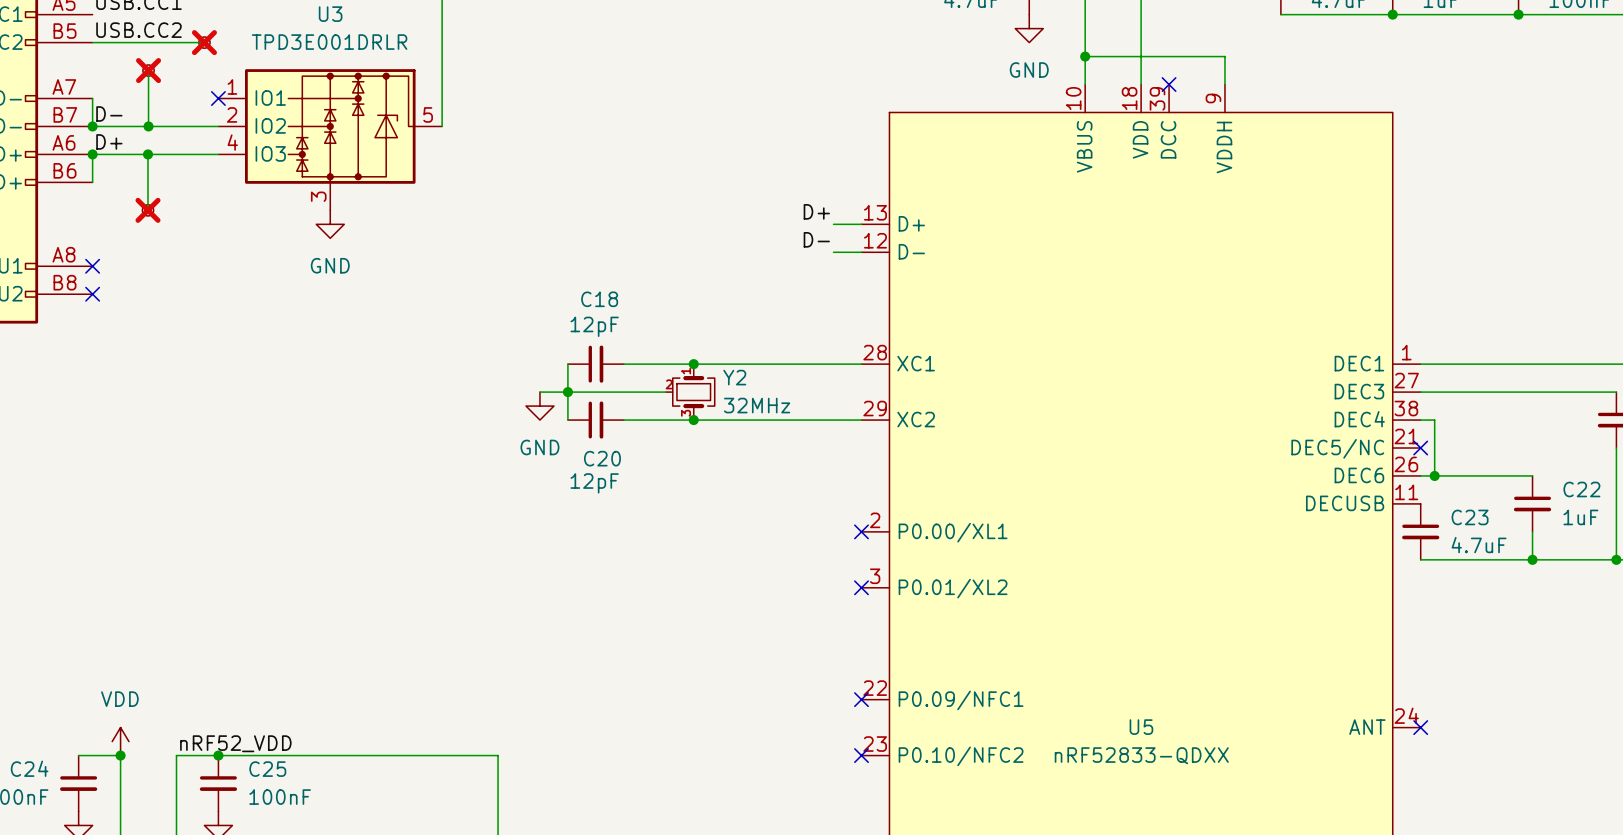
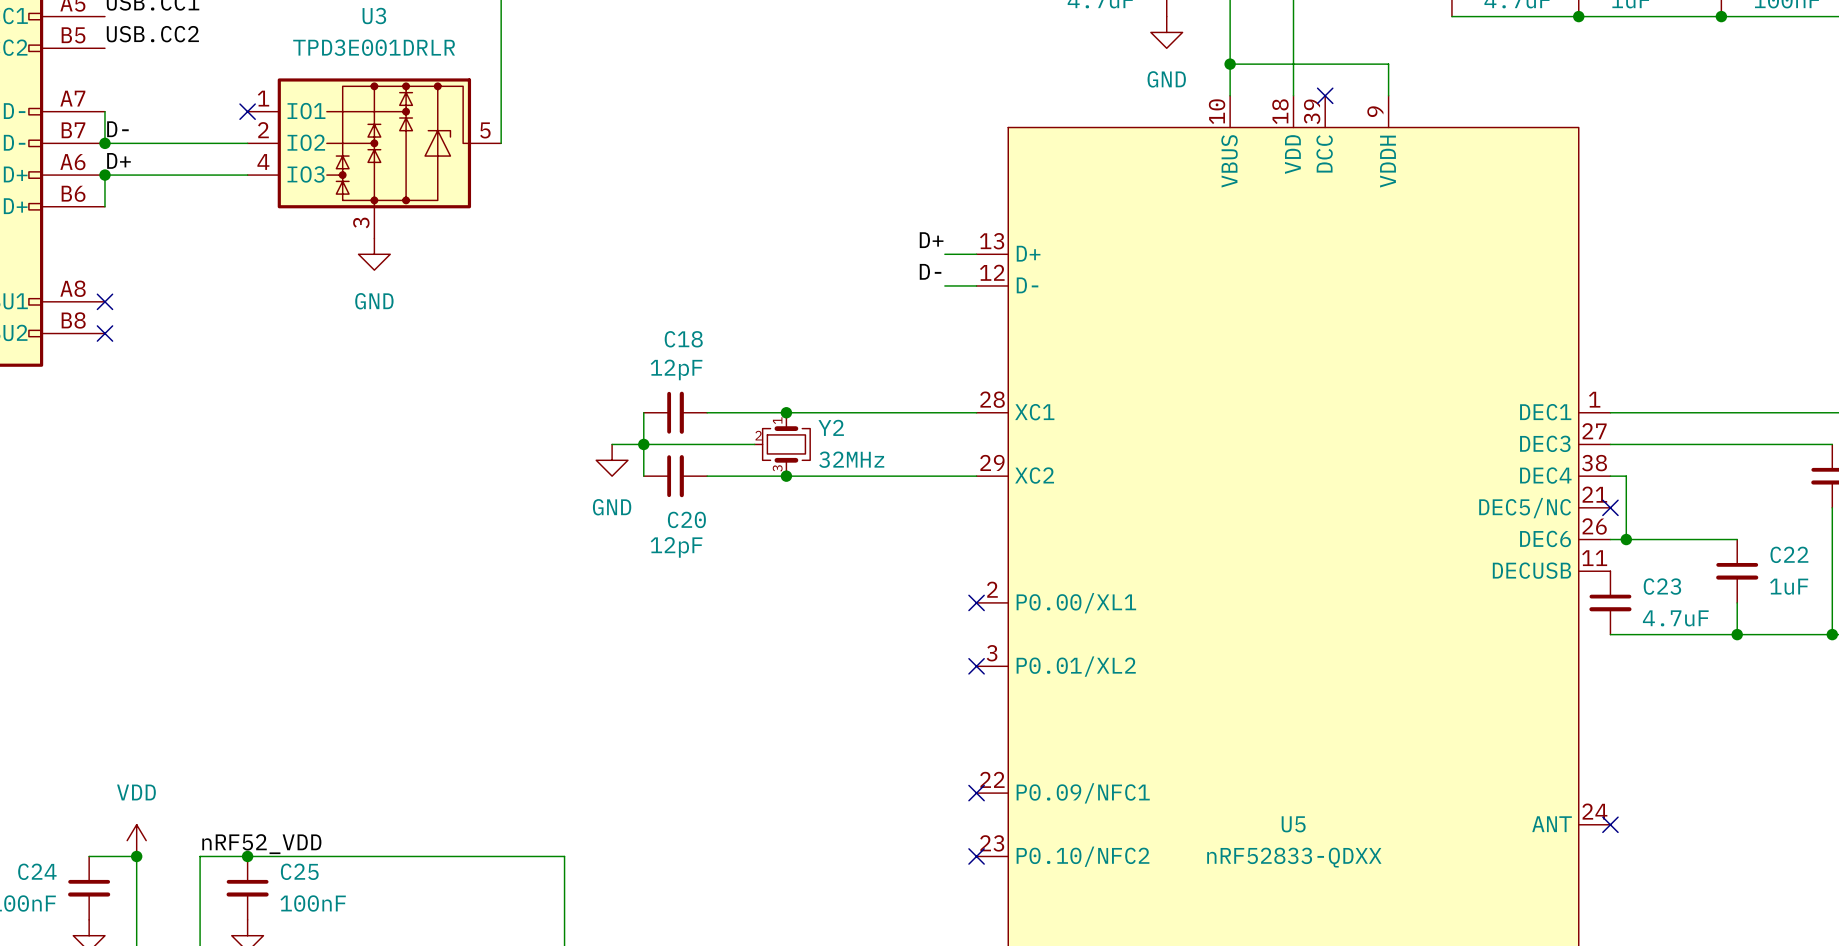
wire: (92, 42) (204, 42) -> none
part: (204, 42) -> none
wire: (148, 70) (148, 126) -> none
part: (148, 70) -> none
junction: (148, 126) -> none
wire: (147, 154) (147, 210) -> none
junction: (147, 154) -> none
part: (147, 210) -> none

